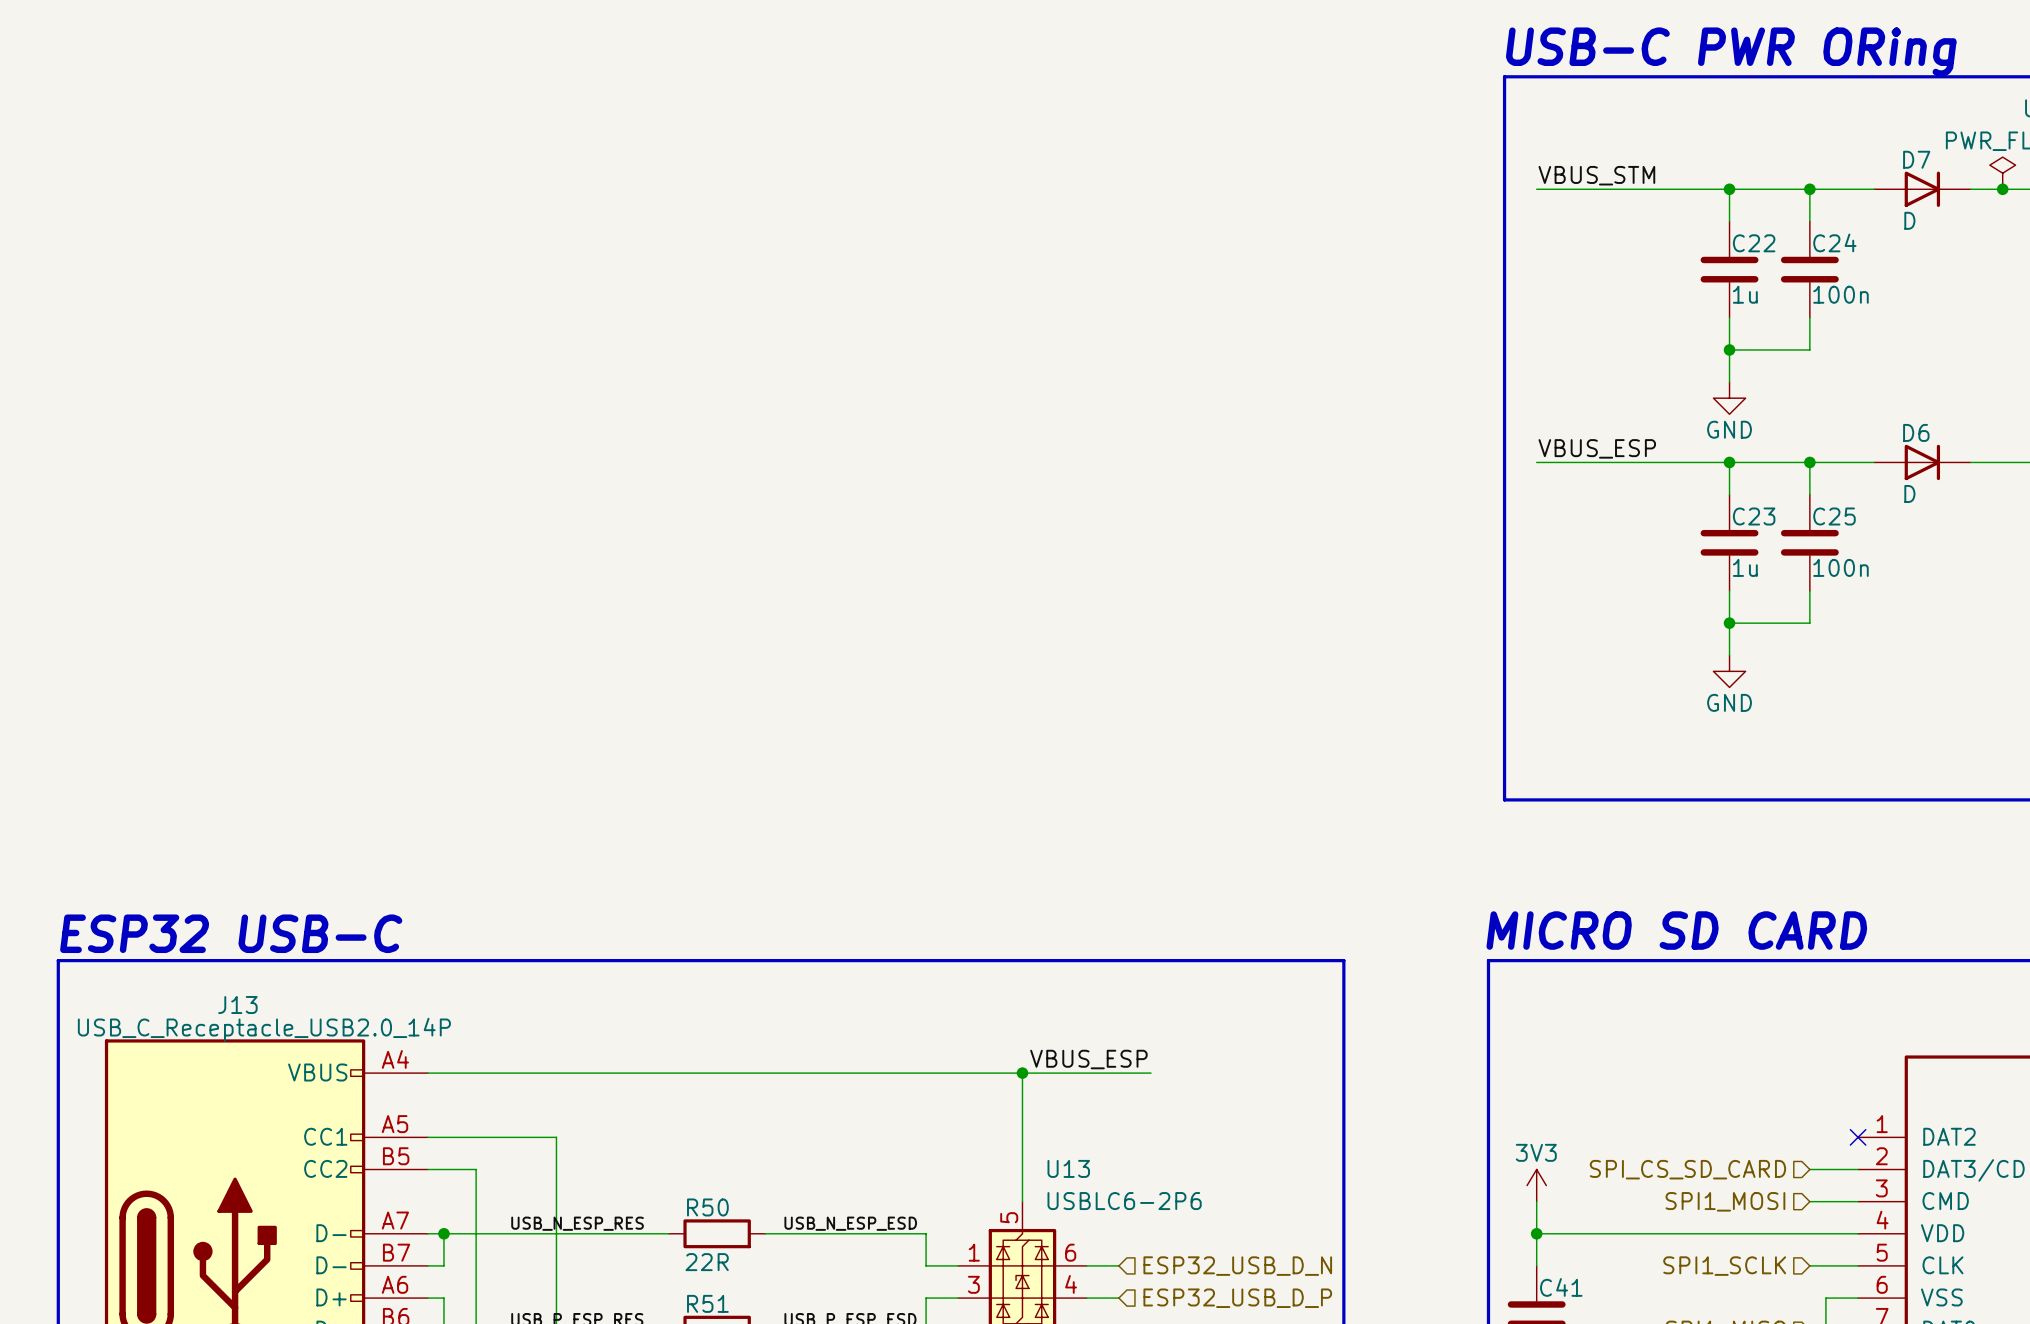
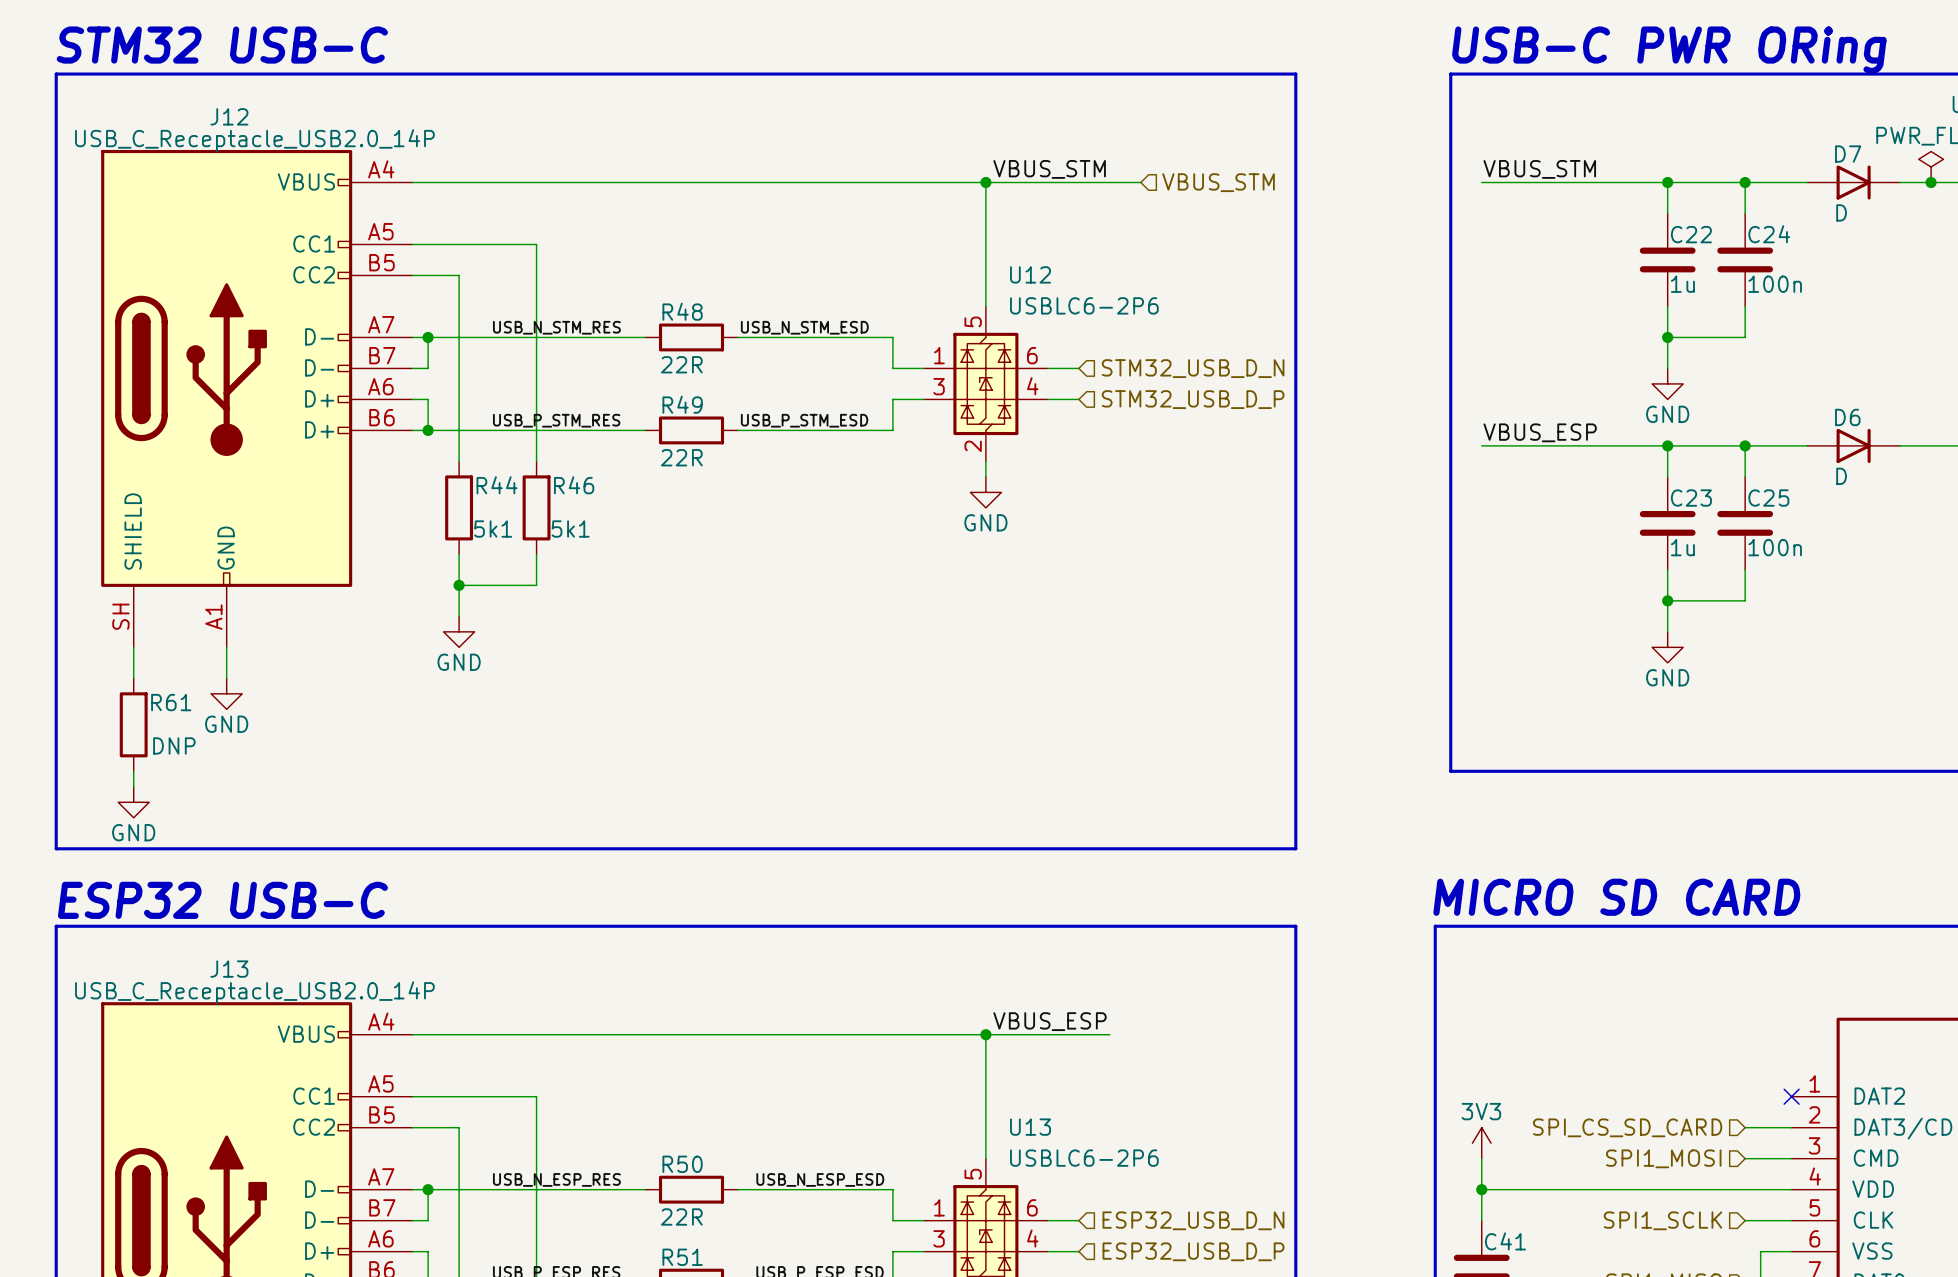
text: none -> STM32 USB-C (222, 45)
line: none -> (56, 74) (1295, 74) (1295, 848) (56, 848) (56, 74)
label: none -> VBUS_STM (1049, 169)
wire: none -> (412, 182) (1140, 182)
wire: none -> (985, 182) (985, 306)
junction: none -> (985, 182)
hierarchical label: none -> VBUS_STM (1218, 182)
wire: none -> (412, 244) (536, 244) (536, 461)
wire: none -> (412, 275) (459, 275) (459, 461)
label: none -> USB_N_STM_RES (556, 327)
label: none -> USB_N_STM_ESD (804, 327)
wire: none -> (412, 337) (645, 337)
wire: none -> (428, 337) (428, 368) (412, 368)
junction: none -> (428, 337)
R48: none -> 22R (691, 337)
wire: none -> (737, 337) (892, 337) (892, 368) (923, 368)
wire: none -> (1047, 368) (1078, 368)
hierarchical label: none -> STM32_USB_D_N (1193, 368)
U12: none -> USBLC6-2P6 (985, 383)
J12: none -> USB_C_Receptacle_USB2.0_14P (256, 398)
wire: none -> (412, 399) (428, 399) (428, 430)
wire: none -> (923, 399) (892, 399) (892, 430) (737, 430)
wire: none -> (1047, 399) (1078, 399)
hierarchical label: none -> STM32_USB_D_P (1193, 399)
label: none -> USB_P_STM_RES (556, 420)
label: none -> USB_P_STM_ESD (804, 420)
wire: none -> (412, 430) (645, 430)
junction: none -> (428, 430)
R49: none -> 22R (691, 430)
wire: none -> (985, 461) (985, 476)
power symbol: none -> GND (985, 492)
R44: none -> 5k1 (459, 507)
R46: none -> 5k1 (536, 507)
wire: none -> (459, 554) (459, 616)
wire: none -> (536, 554) (536, 585) (459, 585)
junction: none -> (459, 585)
power symbol: none -> GND (459, 631)
wire: none -> (133, 647) (133, 678)
wire: none -> (226, 647) (226, 678)
power symbol: none -> GND (226, 693)
R61: none -> DNP (133, 724)
wire: none -> (133, 771) (133, 786)
power symbol: none -> GND (133, 802)

